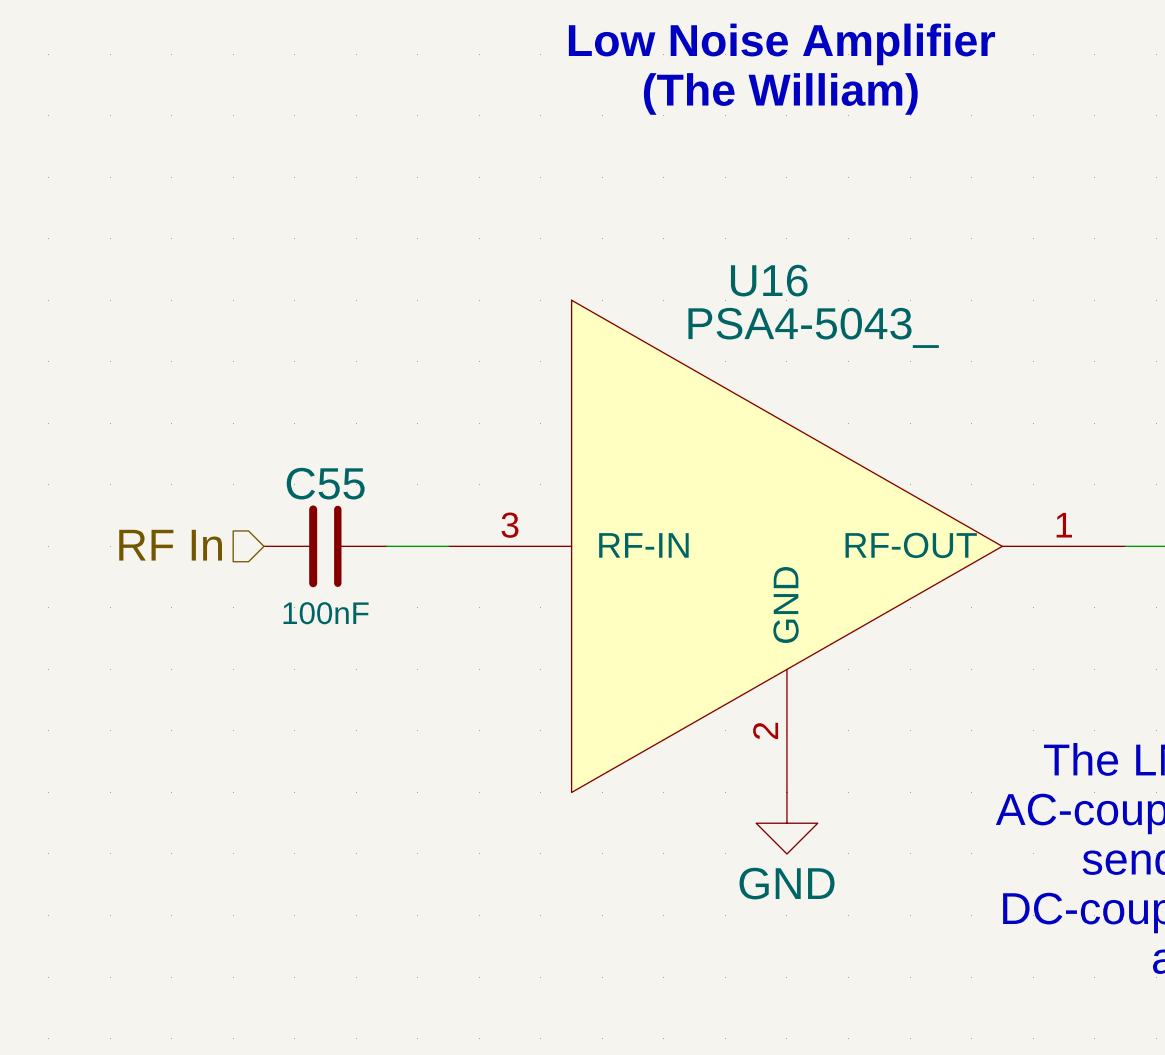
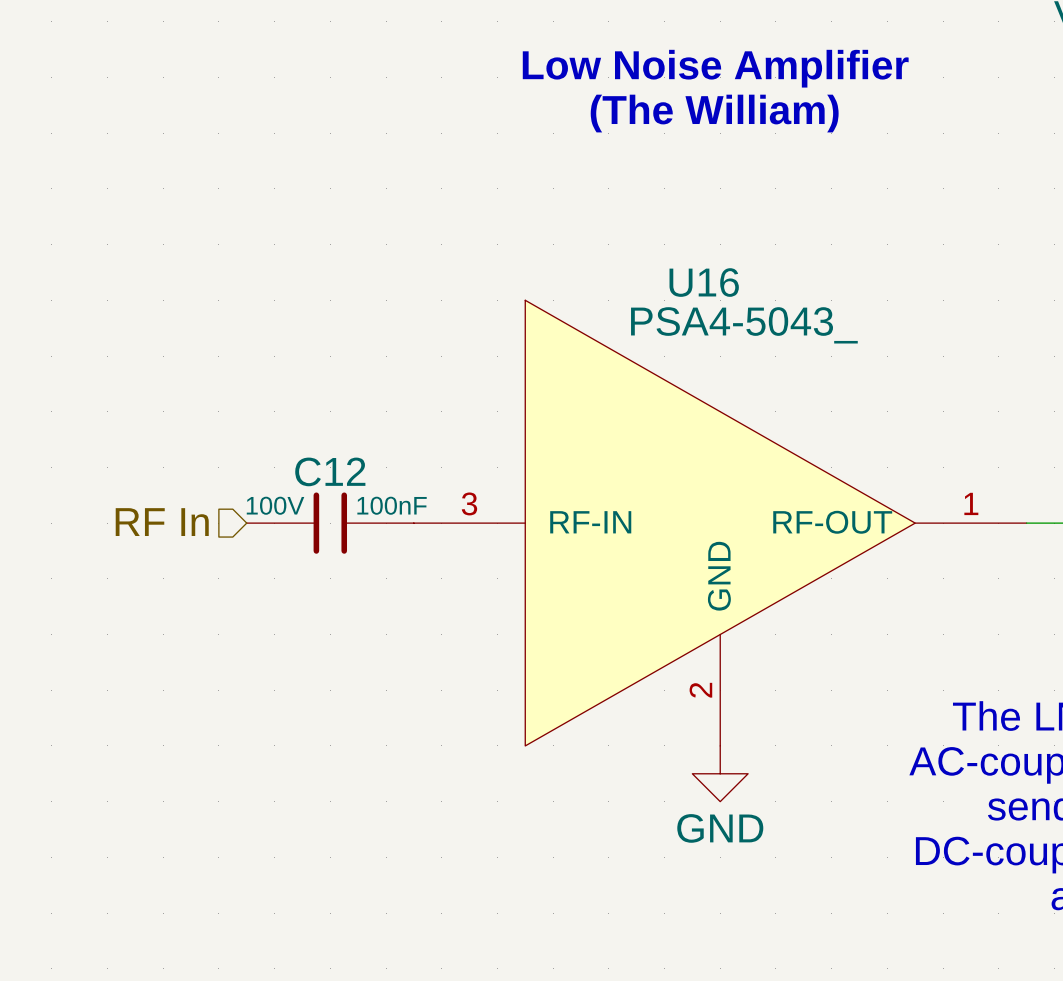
C55: 100nF (325, 546) -> none
C12: none -> 100nF (330, 523)

